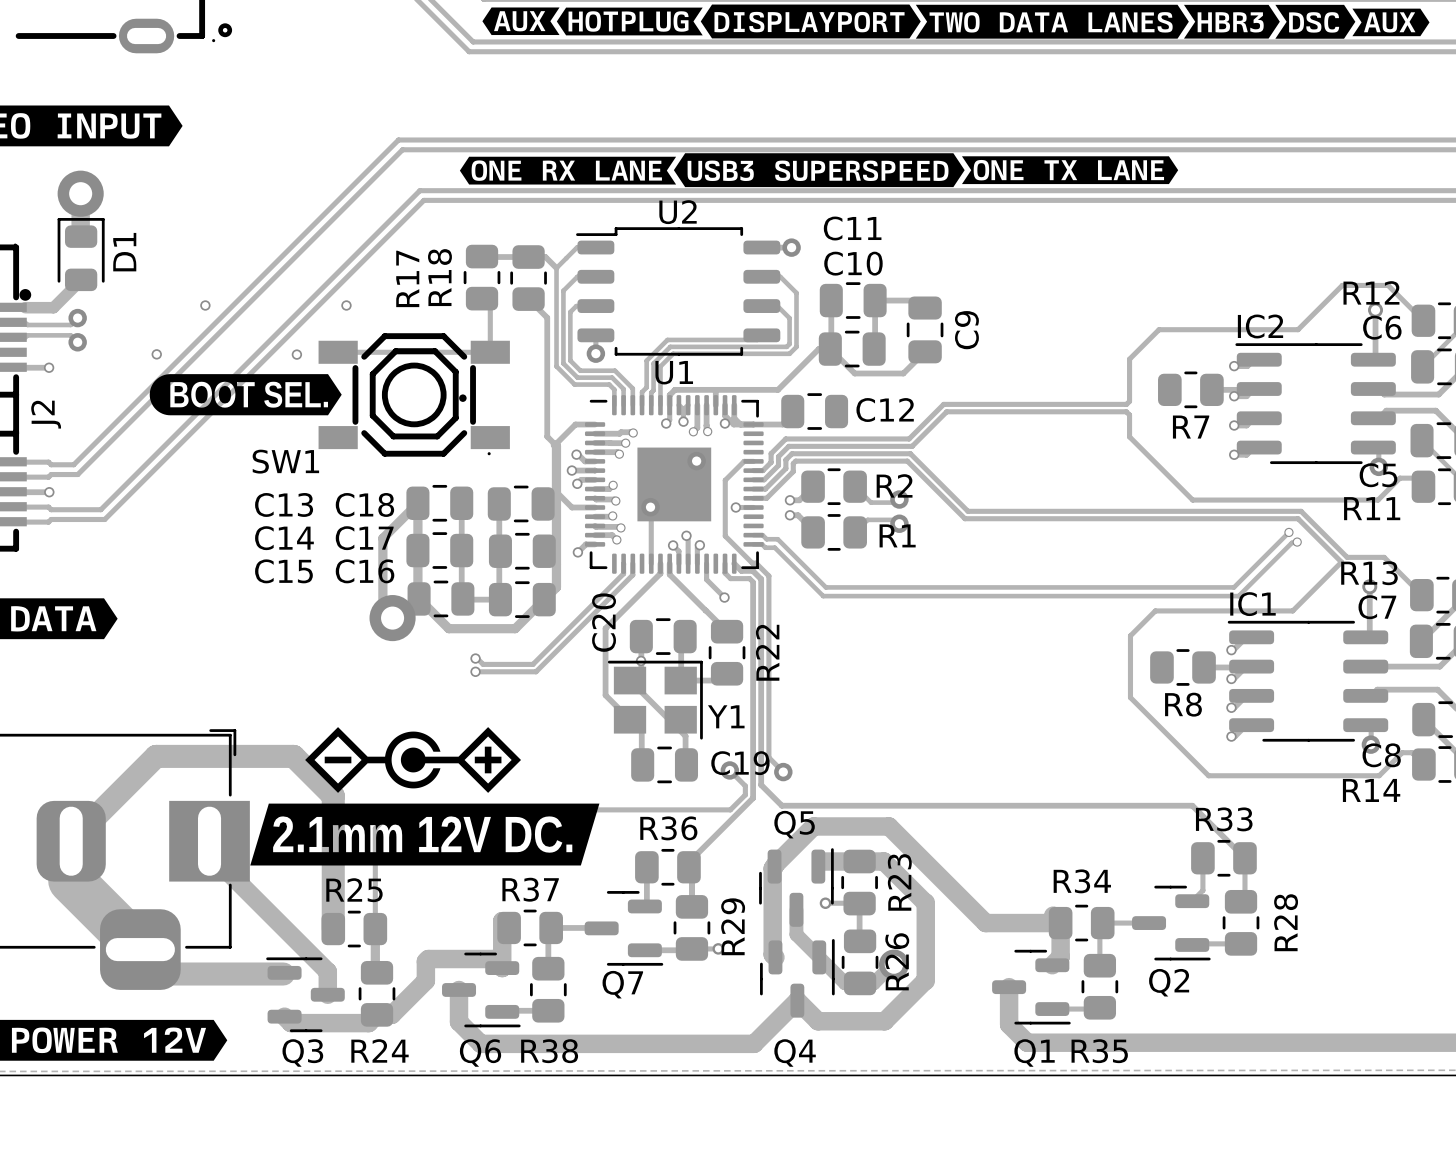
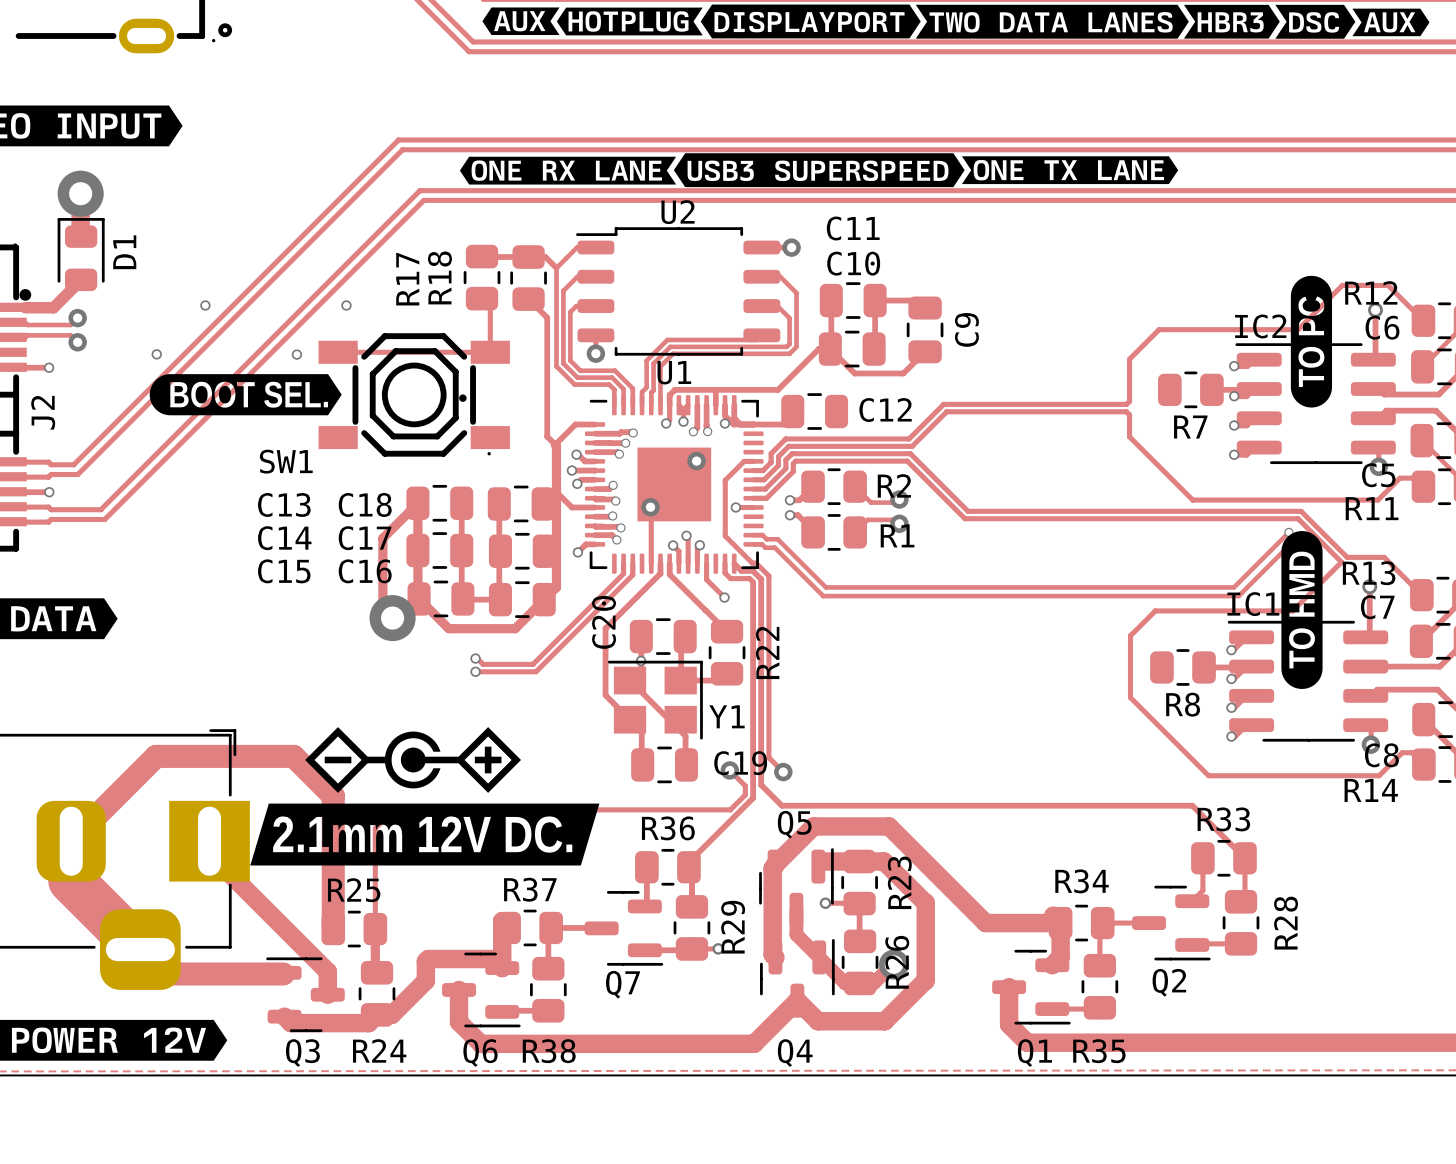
drawing: none -> [1290, 275, 1333, 408]
drawing: none -> [1281, 531, 1323, 689]

